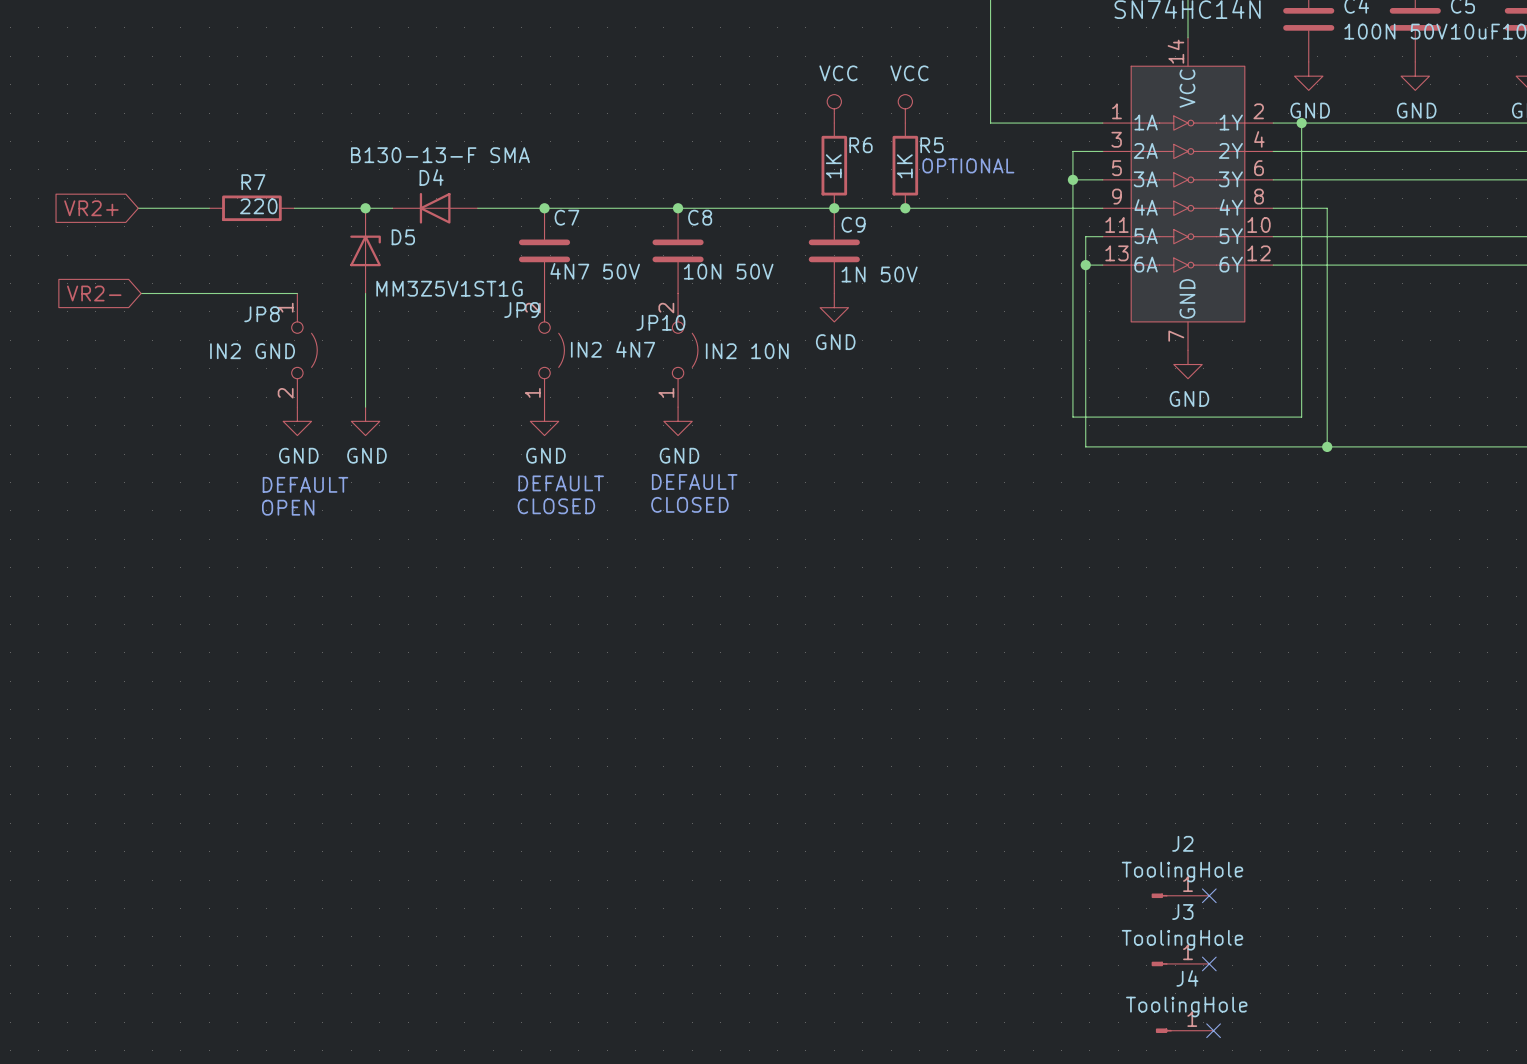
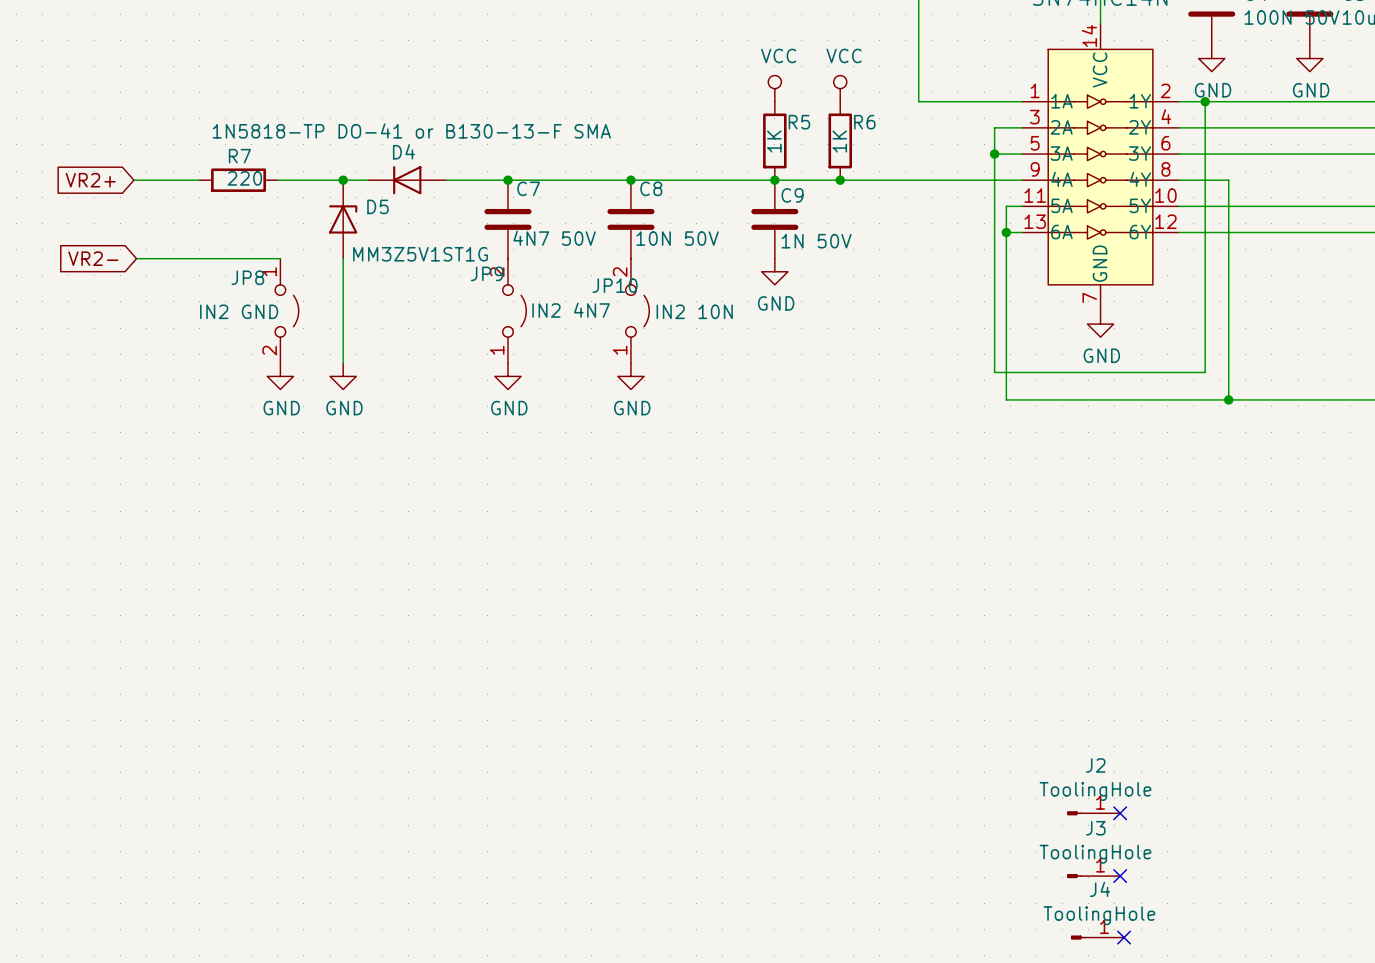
R6 name: R6 (861, 145) -> R5 (799, 122)
R5 name: R5 (932, 145) -> R6 (864, 122)
D4 value: B130-13-F SMA (440, 155) -> 1N5818-TP DO-41 or B130-13-F SMA (411, 131)
text: OPTIONAL (968, 165) -> none
text: DEFAULT (694, 482) -> none
text: DEFAULT (561, 483) -> none
text: DEFAULT (305, 484) -> none
text: CLOSED (689, 504) -> none
text: CLOSED (556, 506) -> none
text: OPEN (288, 507) -> none

